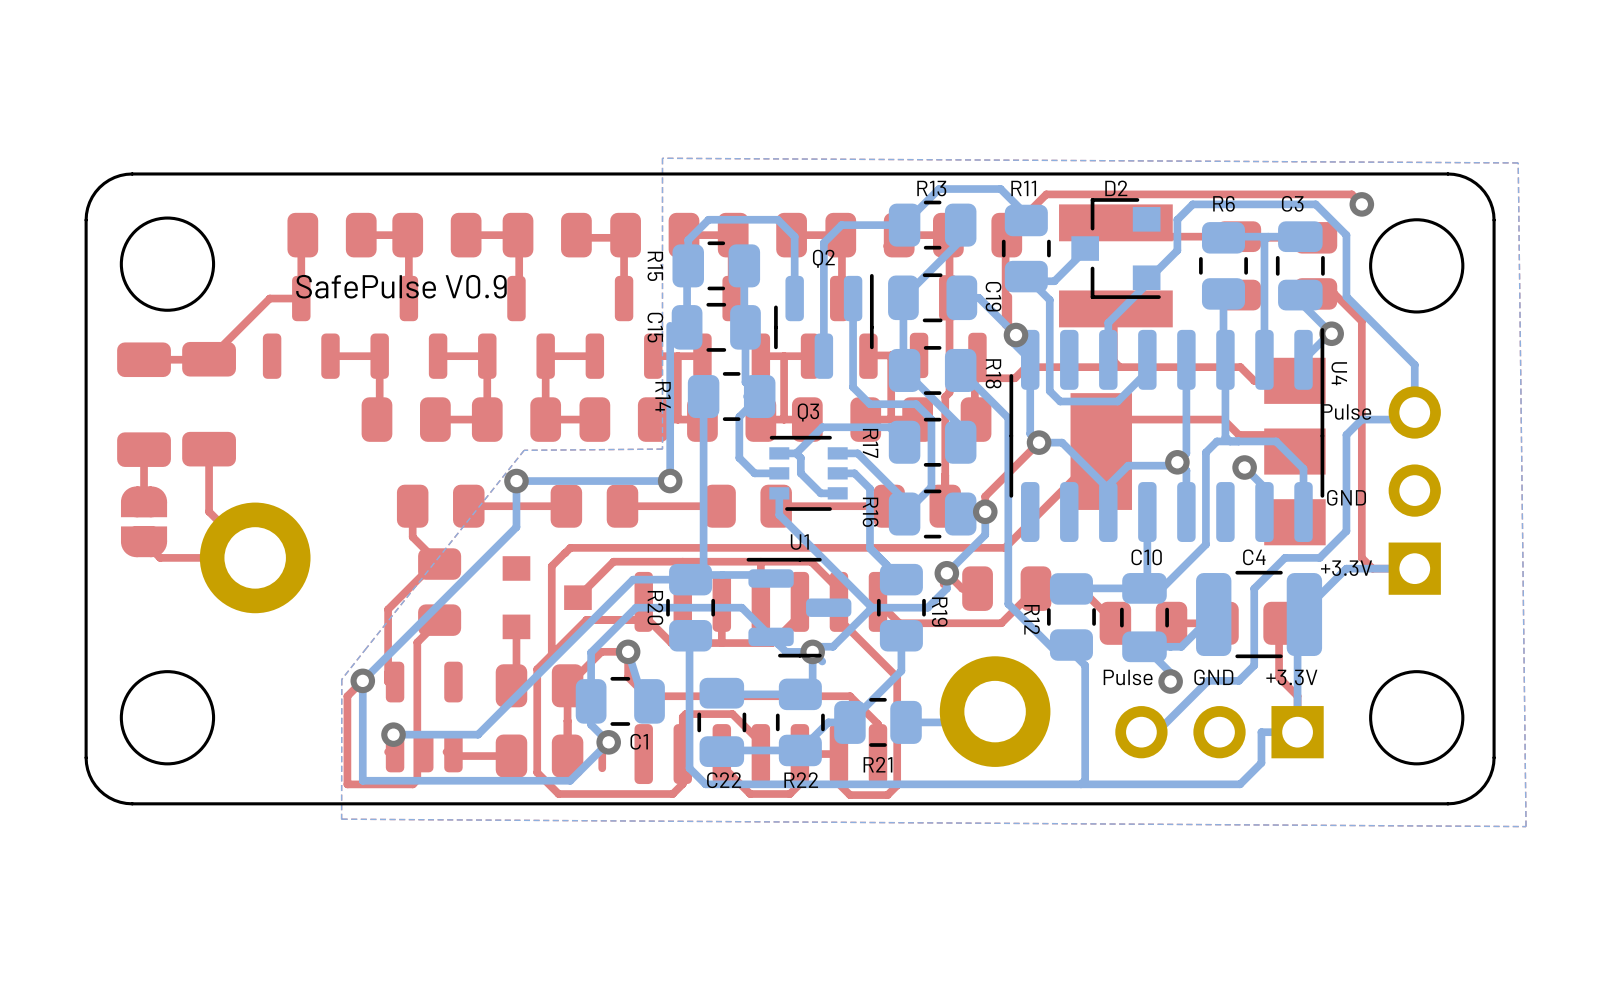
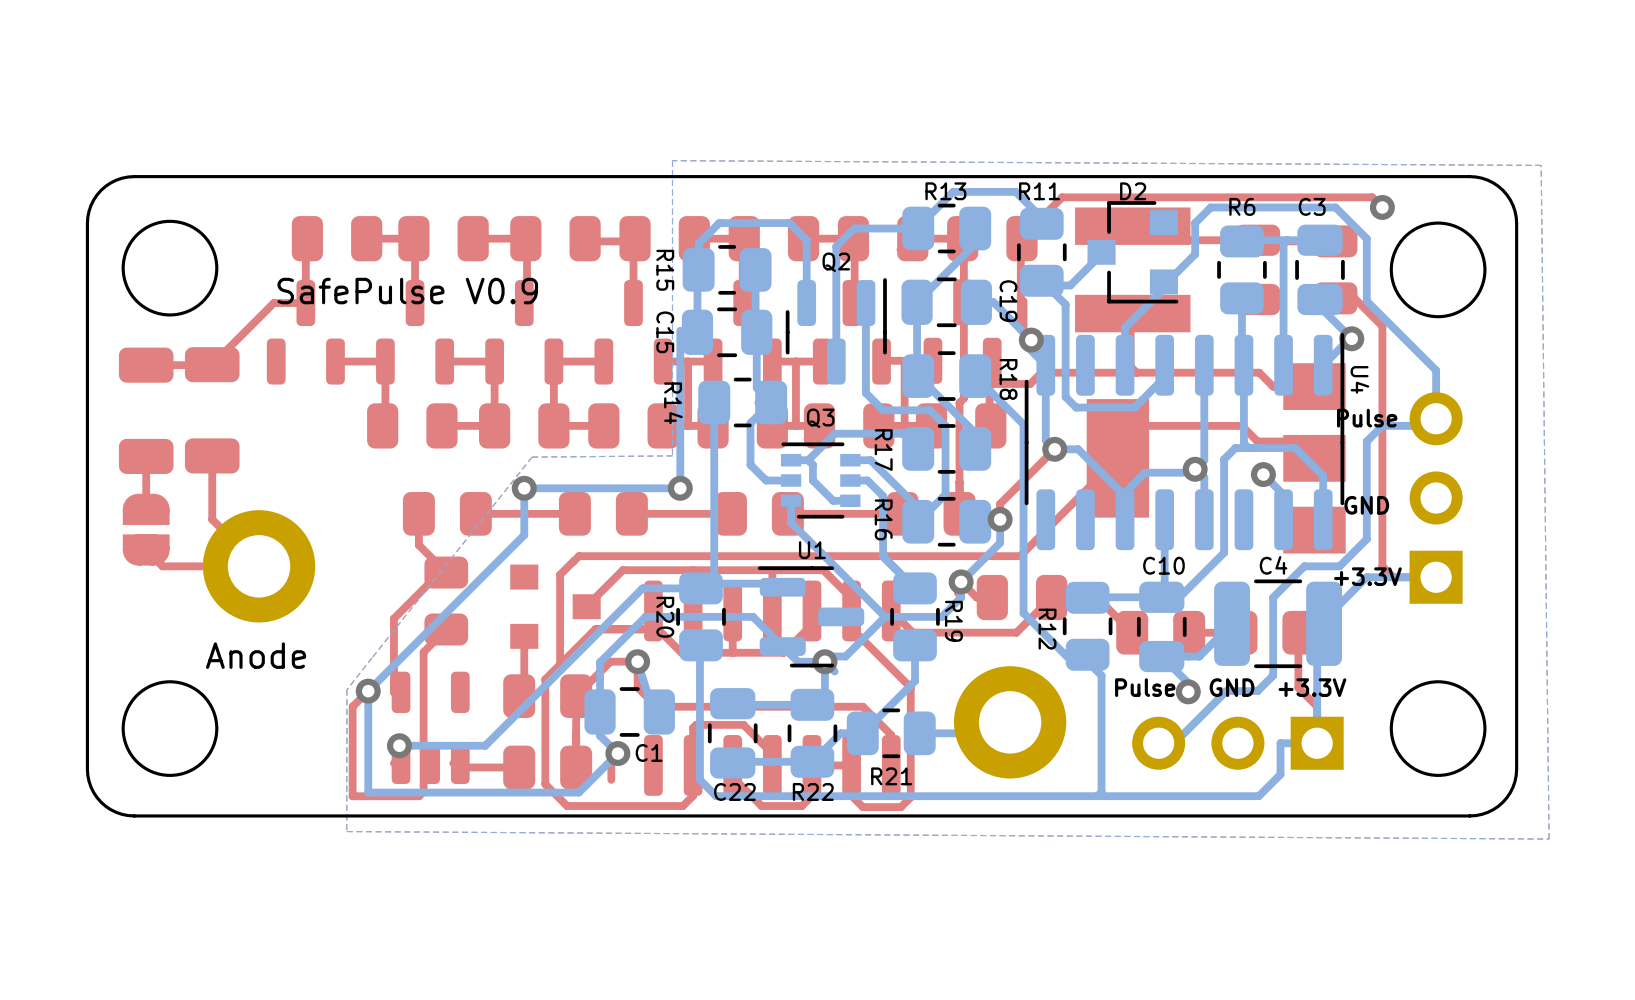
part value: none -> Anode (256, 655)

